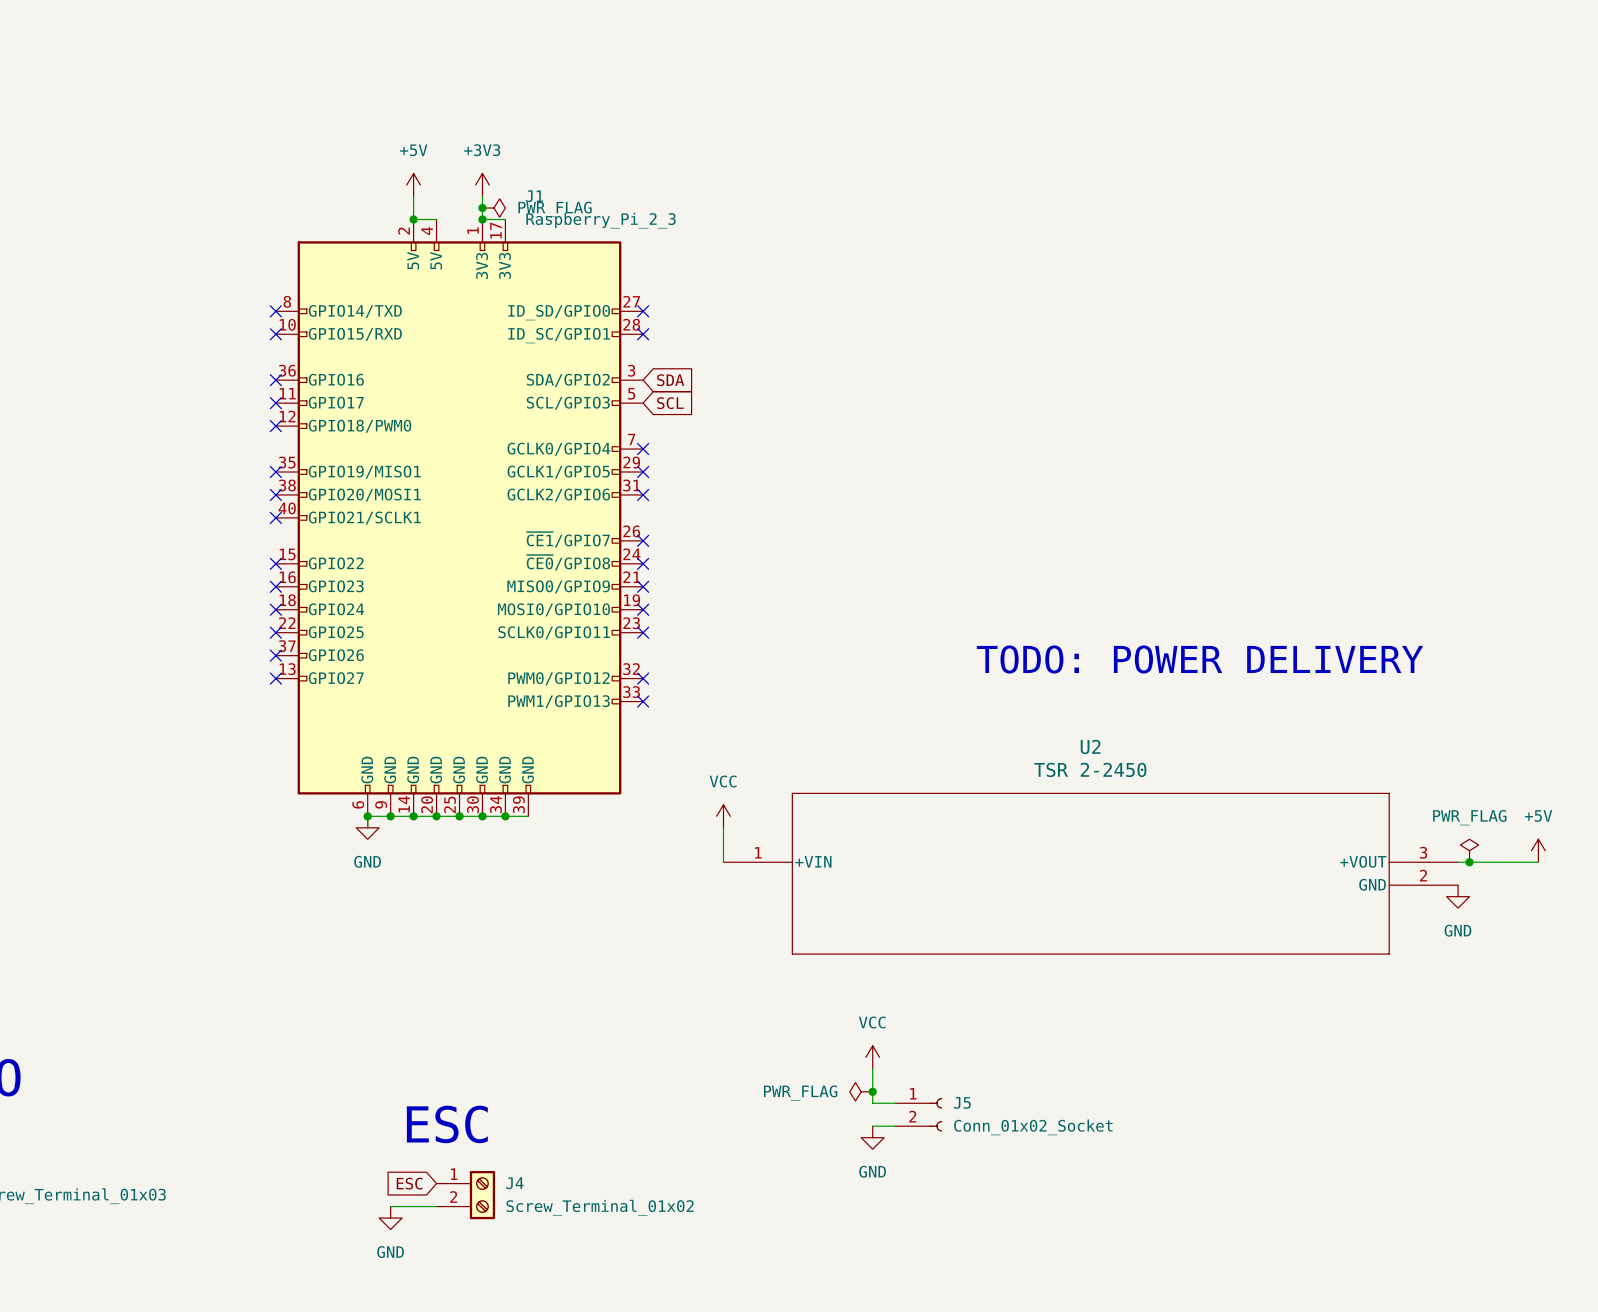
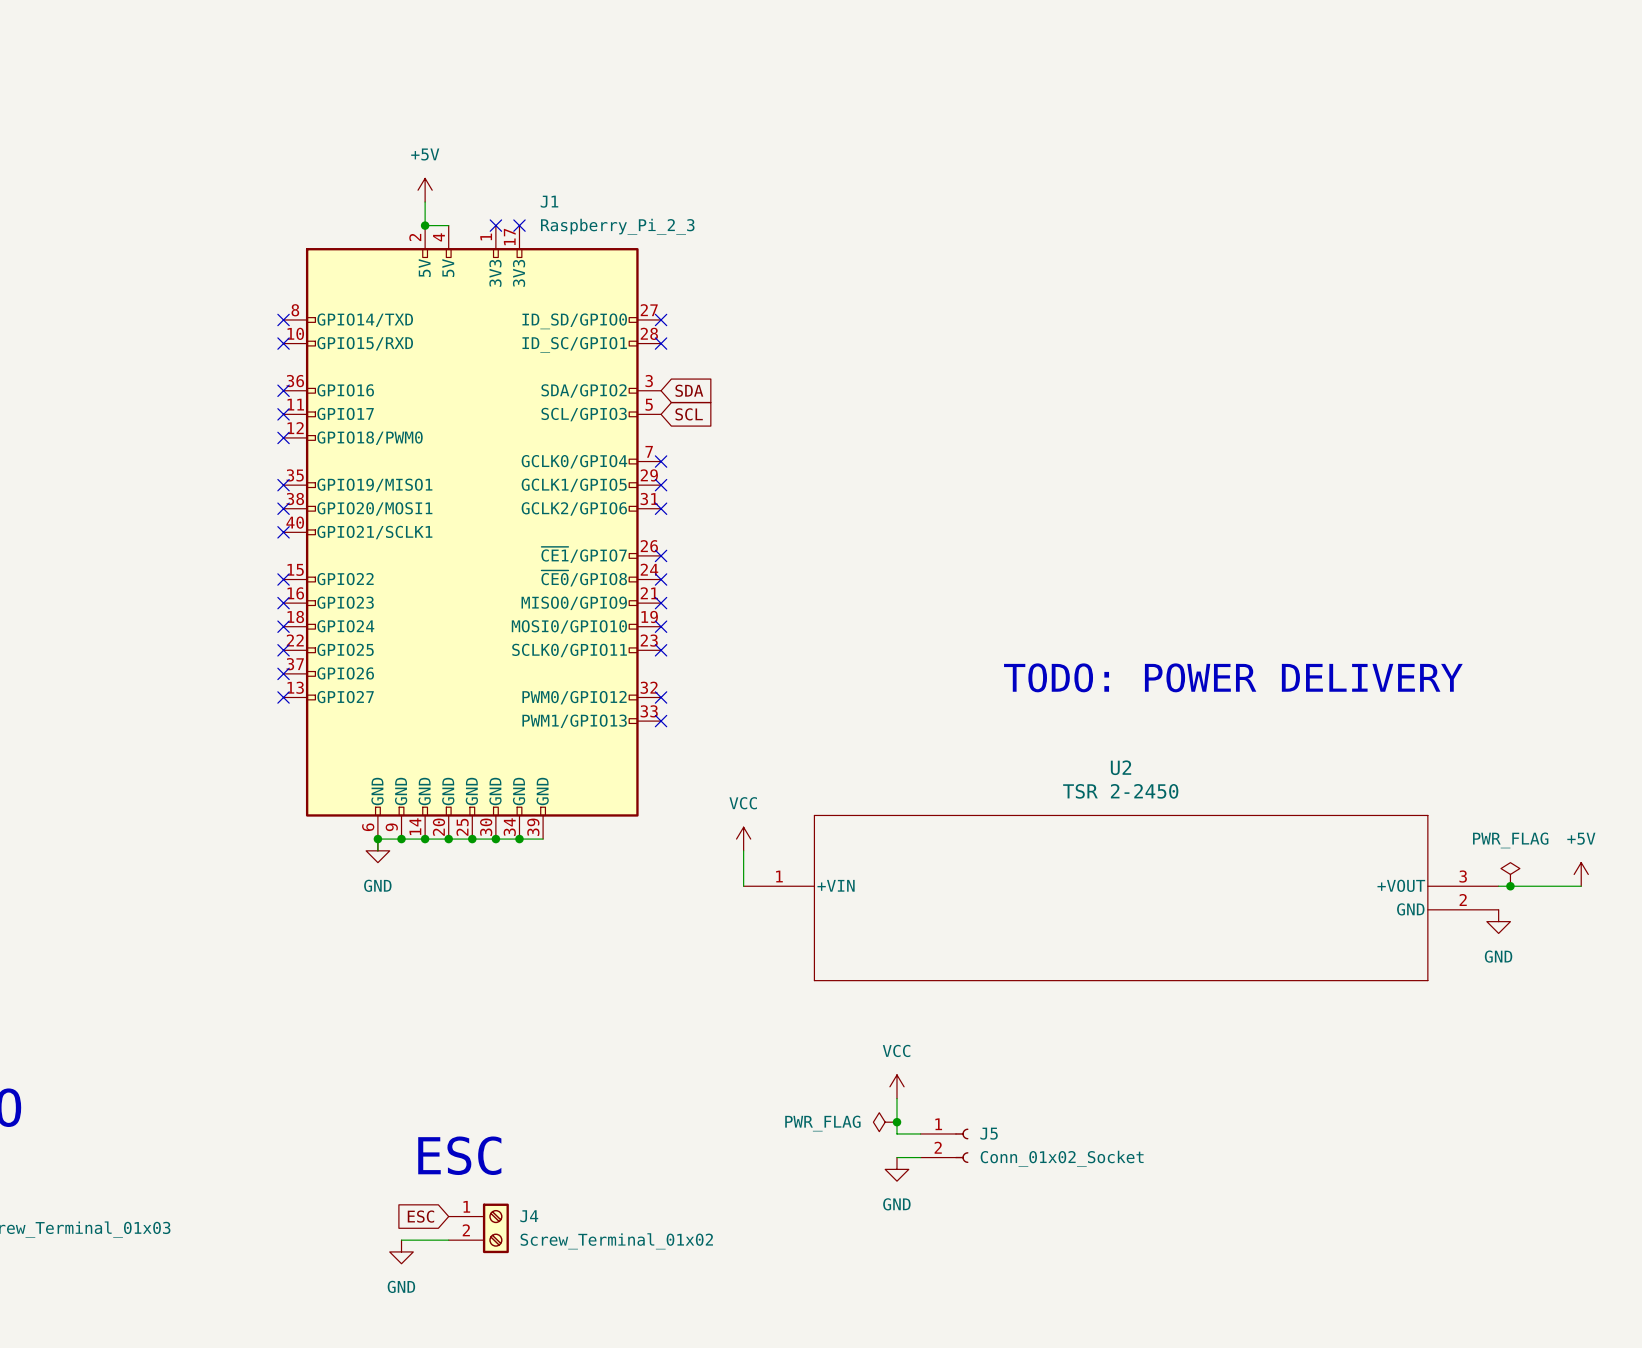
power symbol: +3V3 (482, 185) -> none
wire: (482, 196) (482, 219) (505, 219) -> none
junction: (482, 208) -> none
power symbol: PWR_FLAG (493, 208) -> none
junction: (482, 219) -> none
no-connect mark: none -> (495, 225)
no-connect mark: none -> (519, 225)

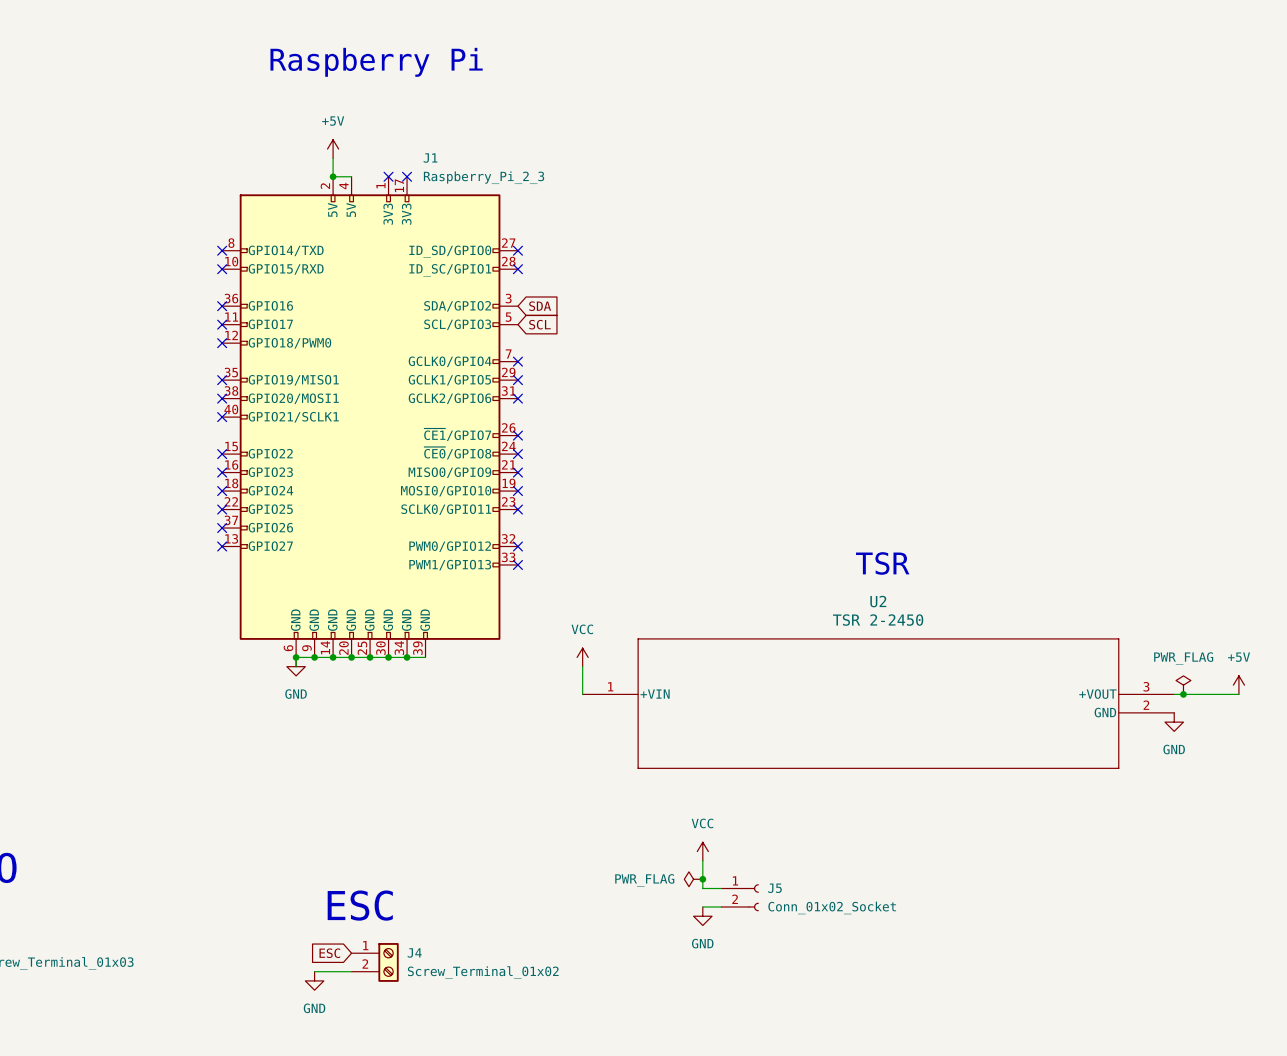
text: none -> Raspberry Pi (376, 62)
text: TODO: POWER DELIVERY (1233, 677) -> none
text: none -> TSR (882, 563)

